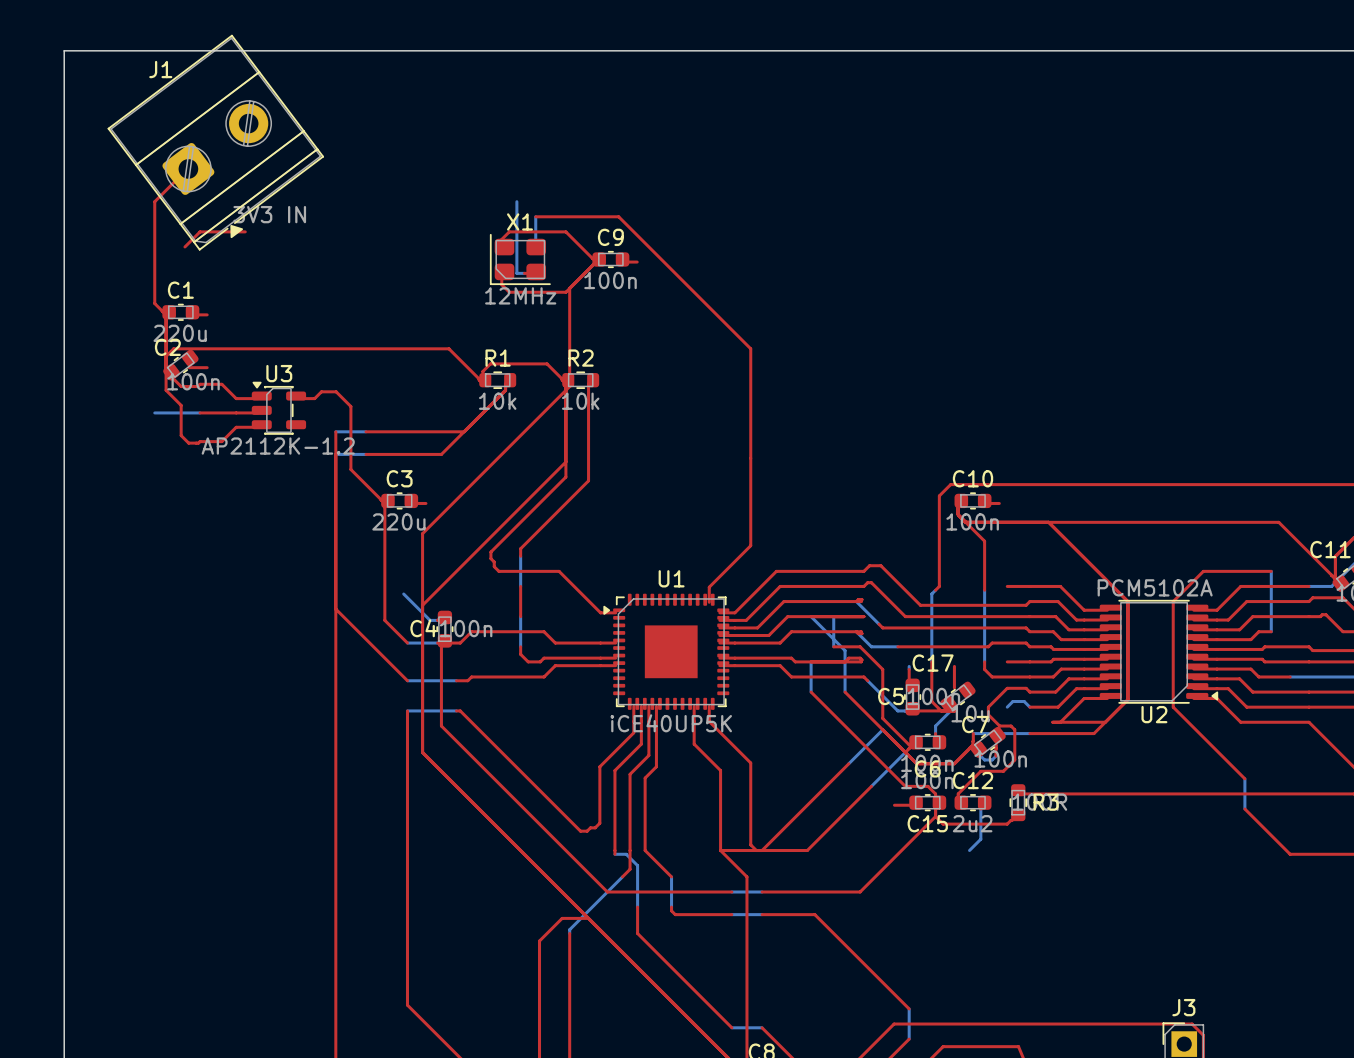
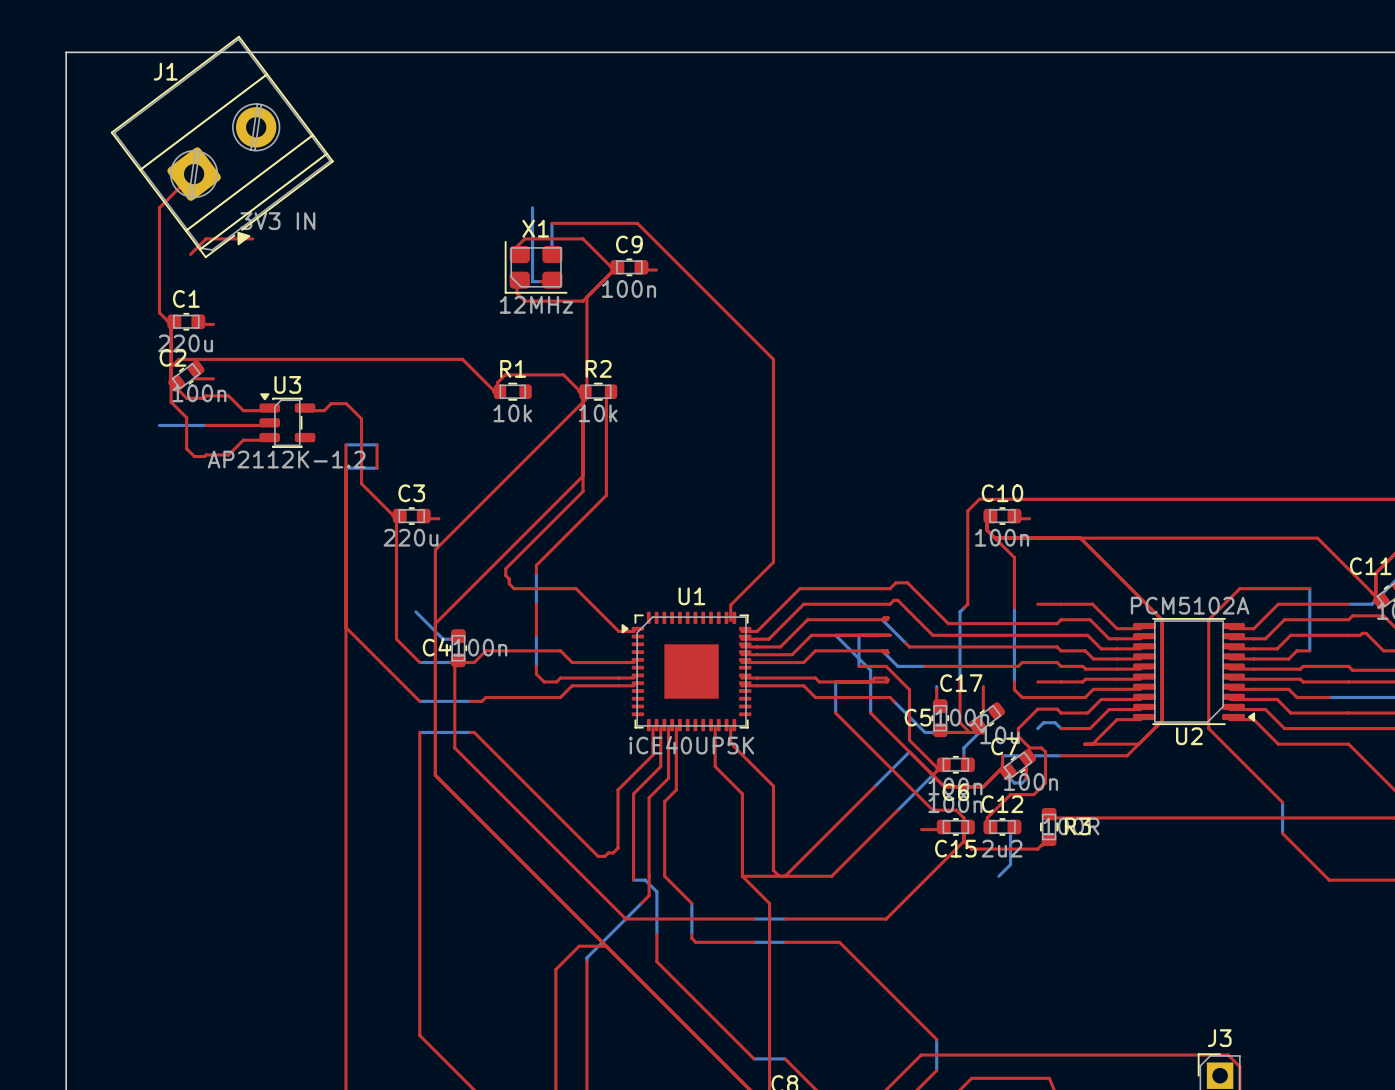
top track: (505, 386) (506, 385) (506, 382) (505, 383) (505, 390) (441, 454) (365, 454) -> none
top track: (365, 431) (464, 431) -> (377, 444) (377, 468)

